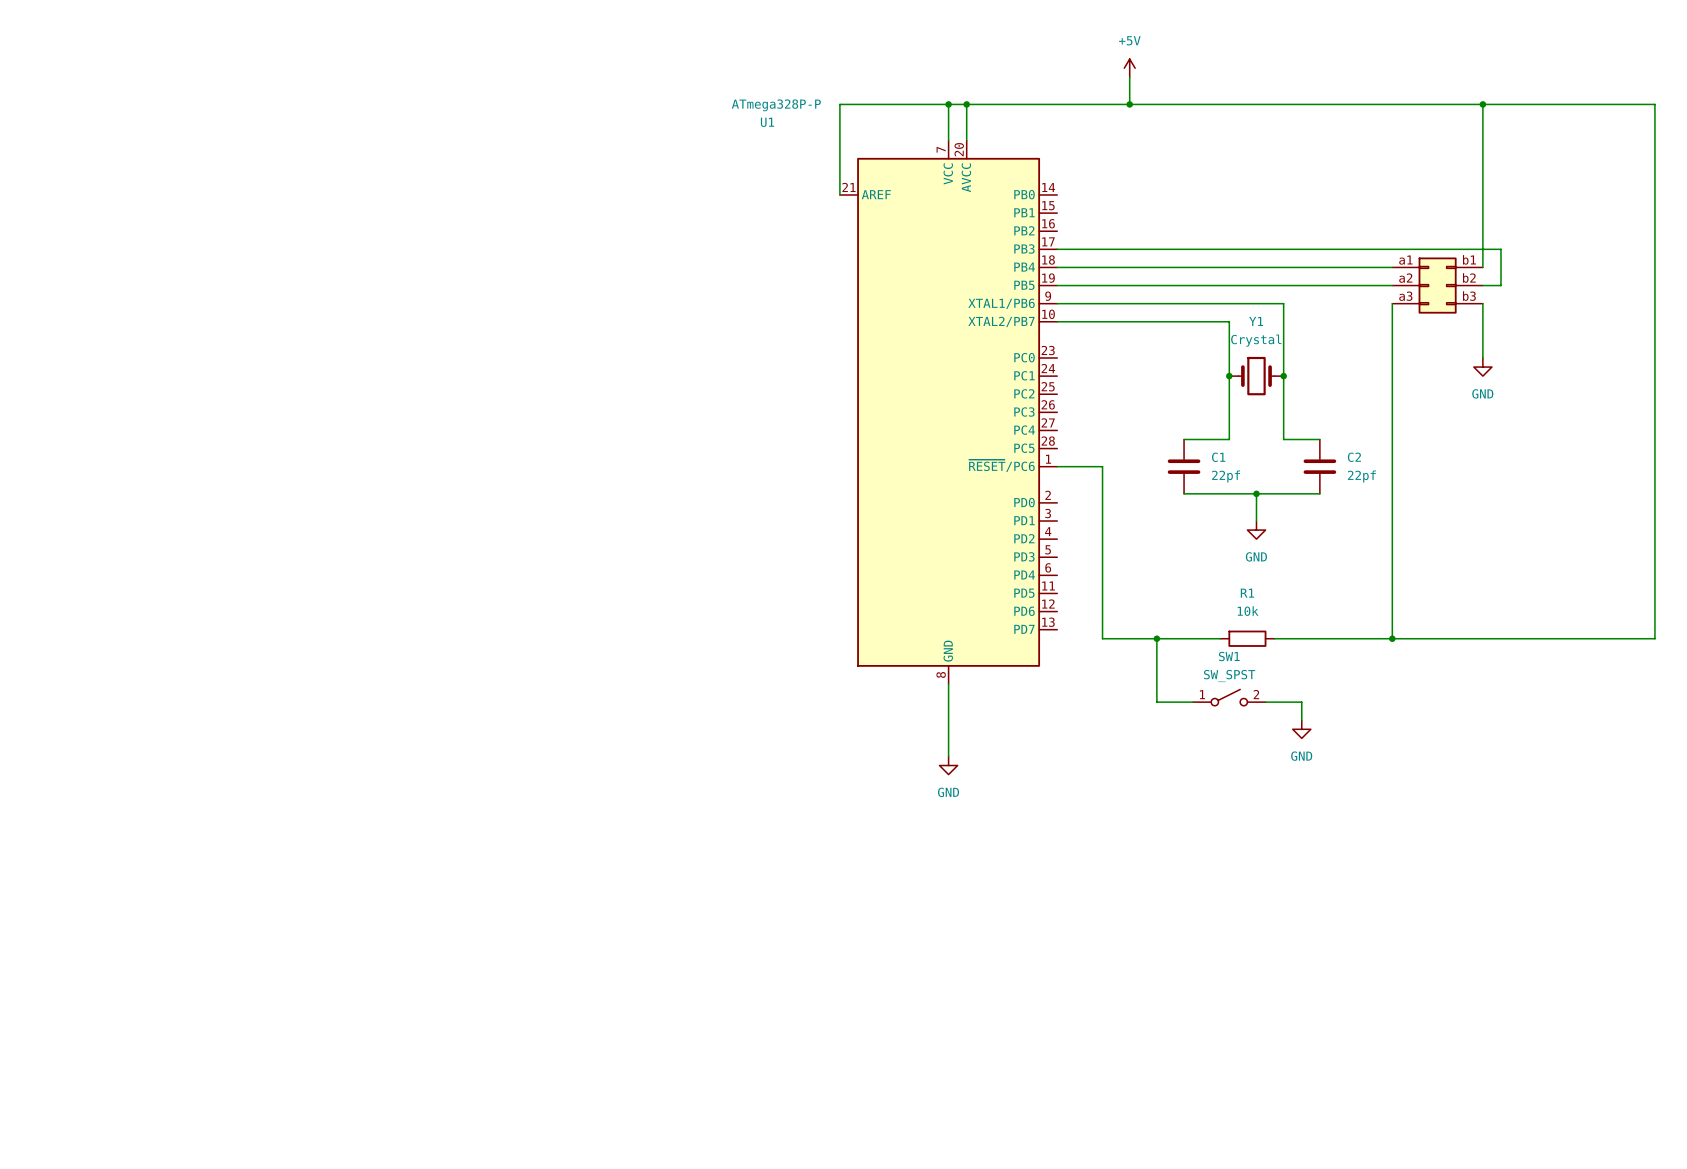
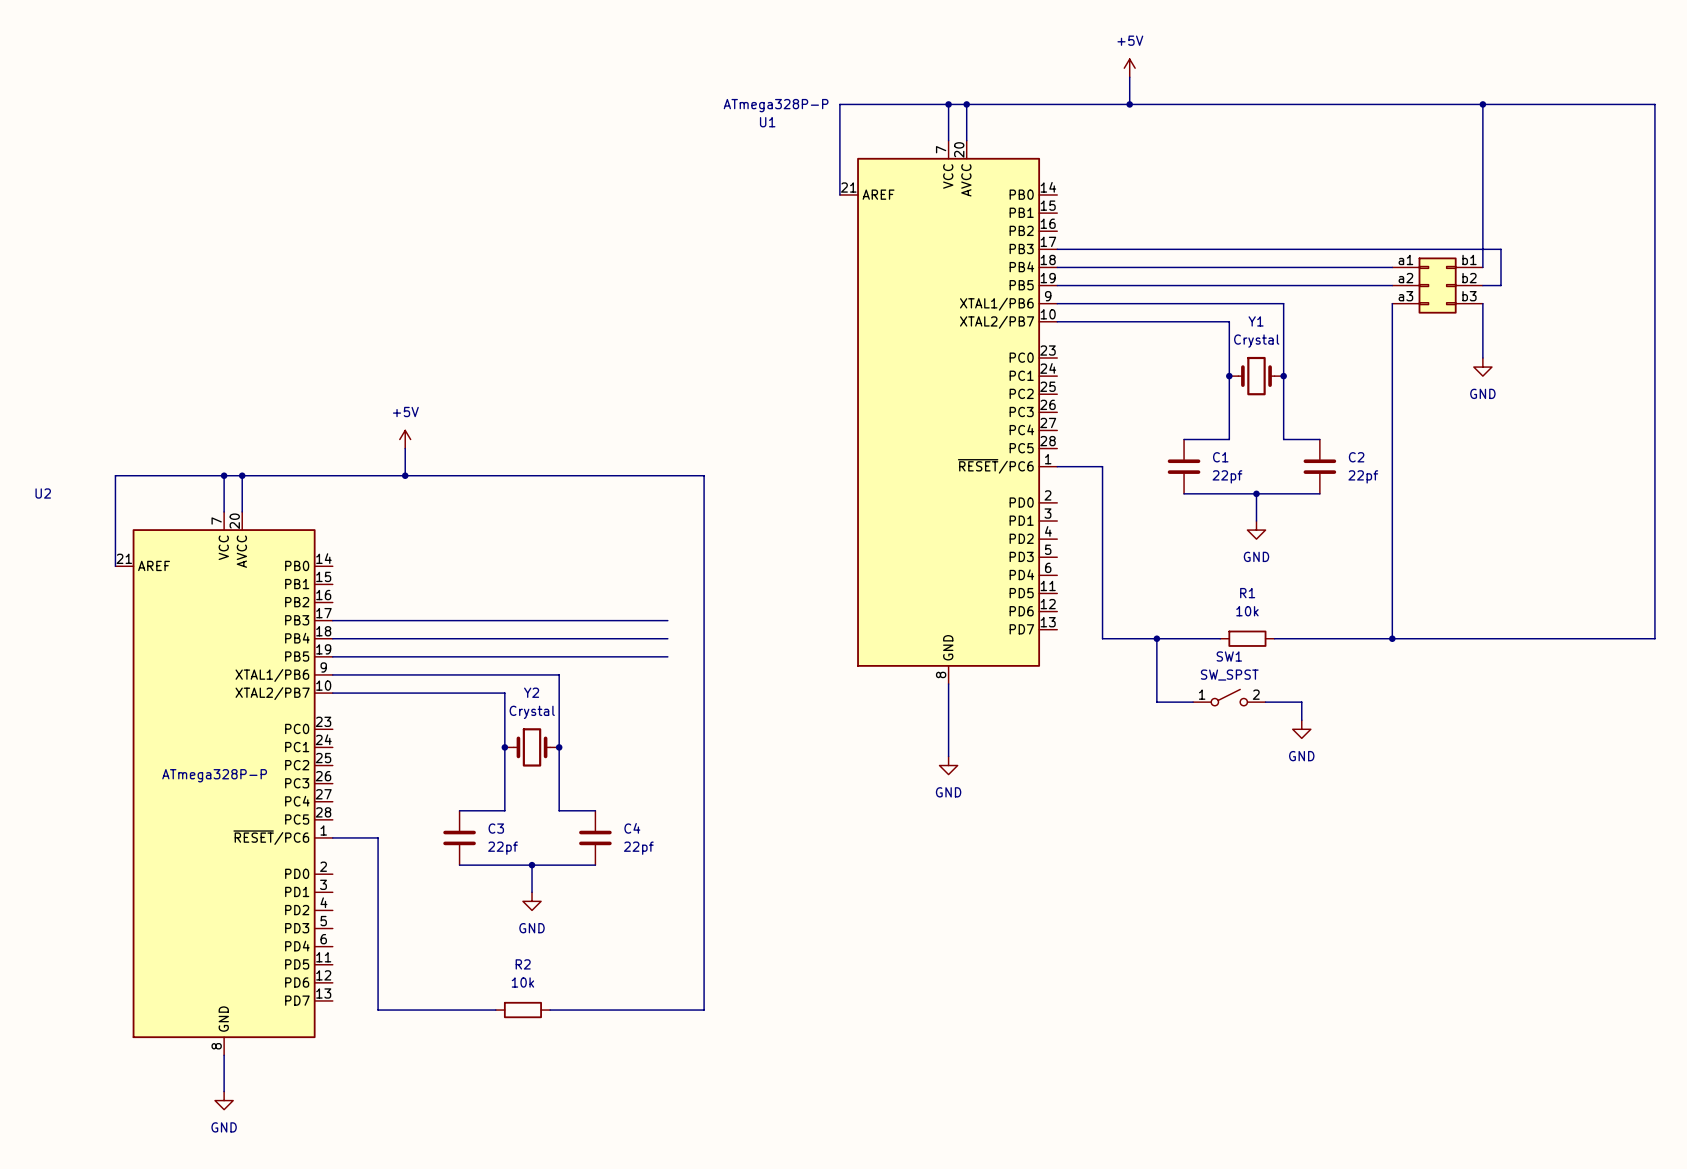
power symbol: none -> +5V (405, 439)
wire: none -> (405, 448) (405, 475)
wire: none -> (224, 475) (224, 511)
junction: none -> (224, 475)
wire: none -> (242, 475) (242, 511)
junction: none -> (242, 475)
junction: none -> (405, 475)
wire: none -> (115, 566) (115, 475) (704, 475) (704, 1010) (550, 1010)
wire: none -> (332, 620) (667, 620)
wire: none -> (332, 638) (667, 638)
wire: none -> (332, 656) (667, 656)
wire: none -> (332, 674) (559, 674) (559, 810) (595, 810)
wire: none -> (332, 693) (504, 693) (504, 810) (459, 810)
junction: none -> (504, 747)
Y2: none -> Crystal (532, 747)
junction: none -> (559, 747)
U2: none -> ATmega328P-P (224, 783)
wire: none -> (332, 837) (378, 837) (378, 1010) (495, 1010)
C3: none -> 22pf (459, 837)
C4: none -> 22pf (595, 837)
wire: none -> (459, 865) (595, 865)
wire: none -> (532, 865) (532, 892)
junction: none -> (532, 865)
power symbol: none -> GND (532, 901)
R2: none -> 10k (522, 1010)
wire: none -> (224, 1055) (224, 1091)
power symbol: none -> GND (224, 1100)

